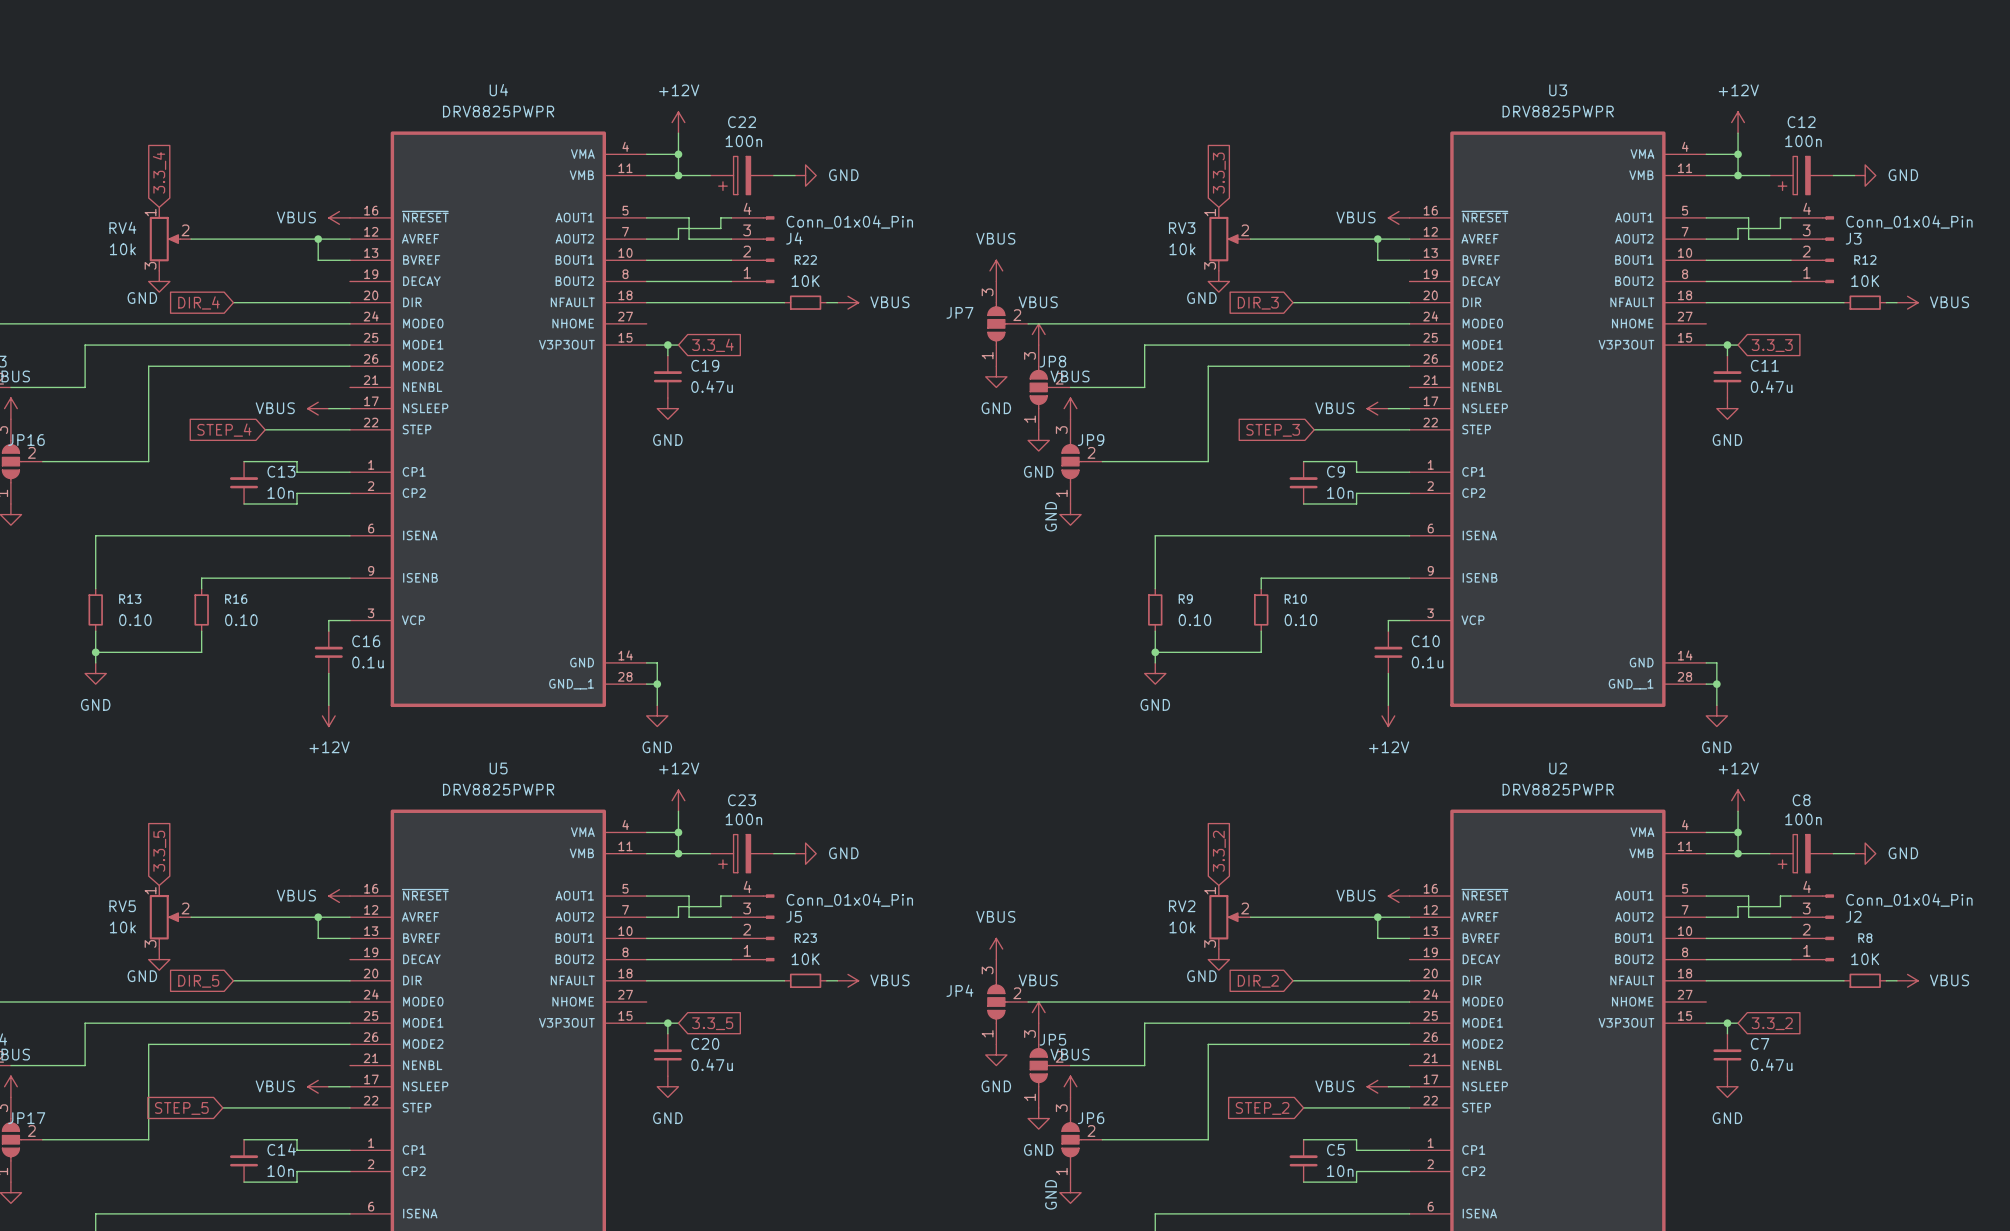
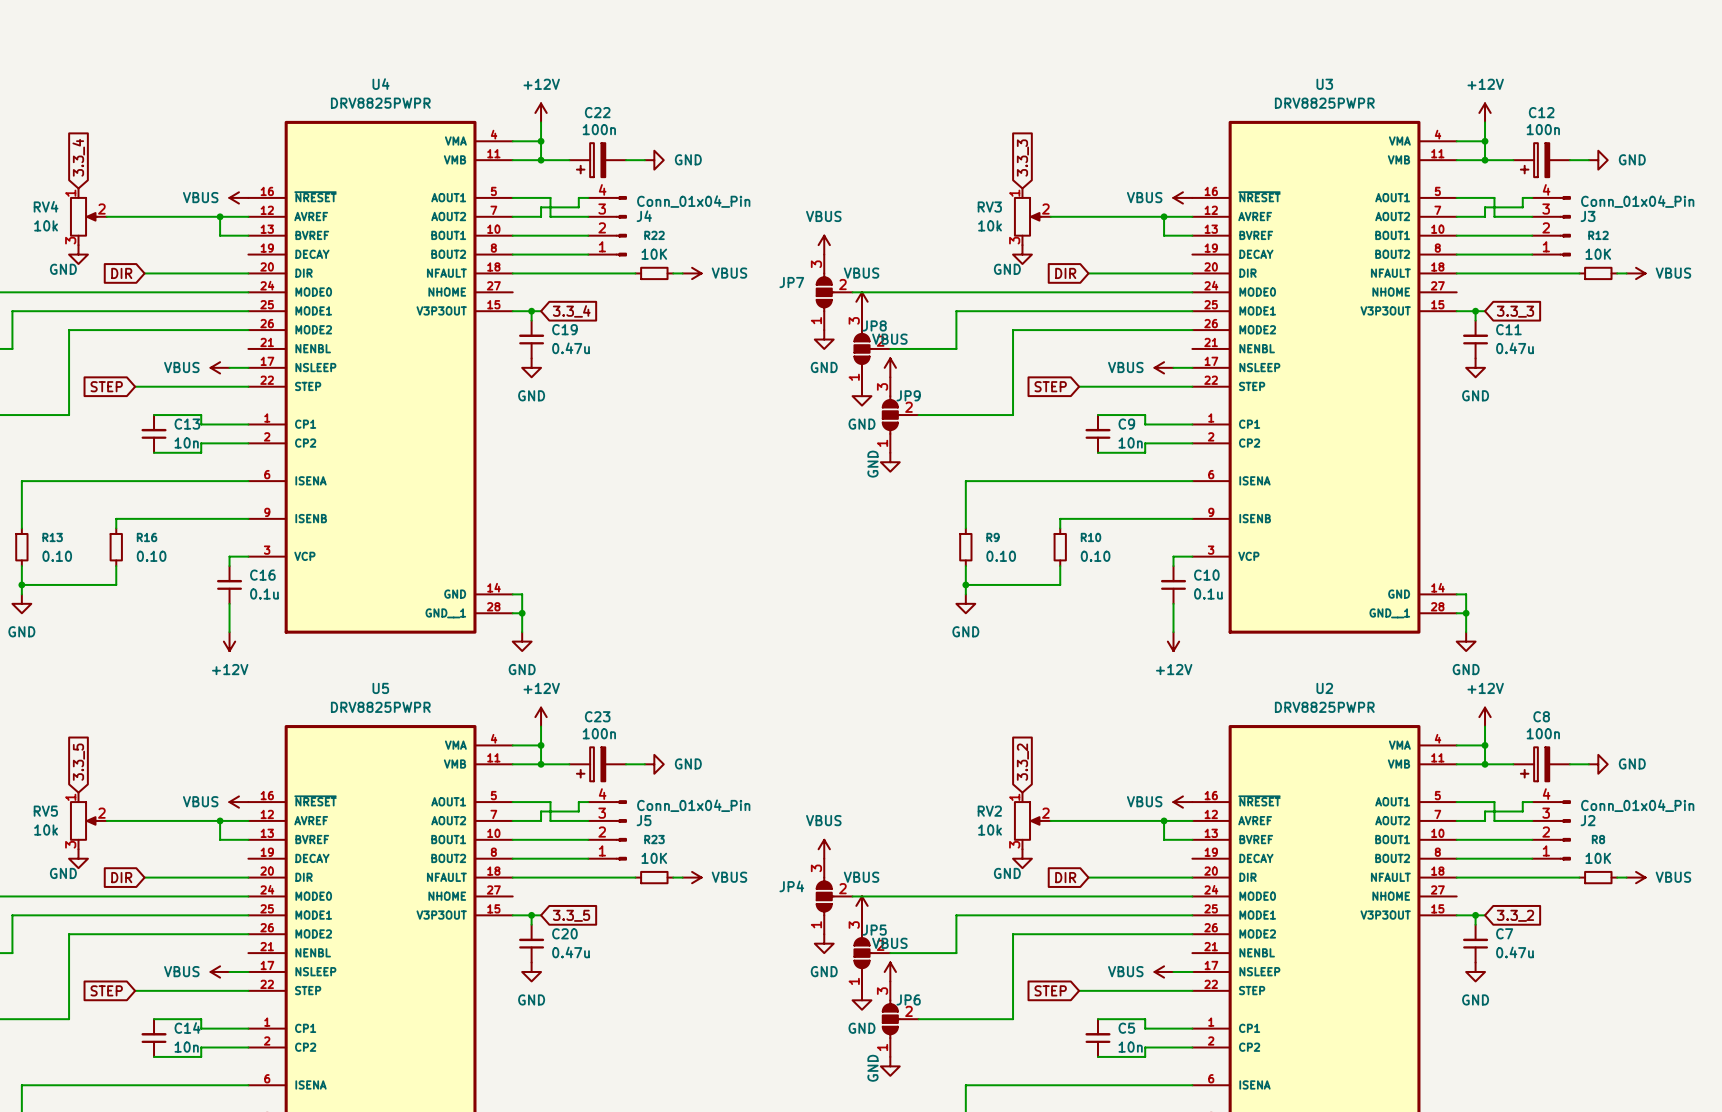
global label: DIR_4 (198, 302) -> DIR (121, 273)
global label: DIR_3 (1258, 303) -> DIR (1065, 273)
wire: none -> (135, 386) (172, 386)
wire: none -> (1079, 386) (1107, 386)
global label: STEP_4 (224, 430) -> STEP (106, 386)
global label: STEP_3 (1273, 430) -> STEP (1050, 386)
global label: DIR_5 (198, 981) -> DIR (121, 877)
global label: DIR_2 (1258, 981) -> DIR (1065, 877)
wire: none -> (1079, 990) (1097, 990)
global label: STEP_5 (181, 1108) -> STEP (106, 990)
global label: STEP_2 (1262, 1108) -> STEP (1050, 990)

